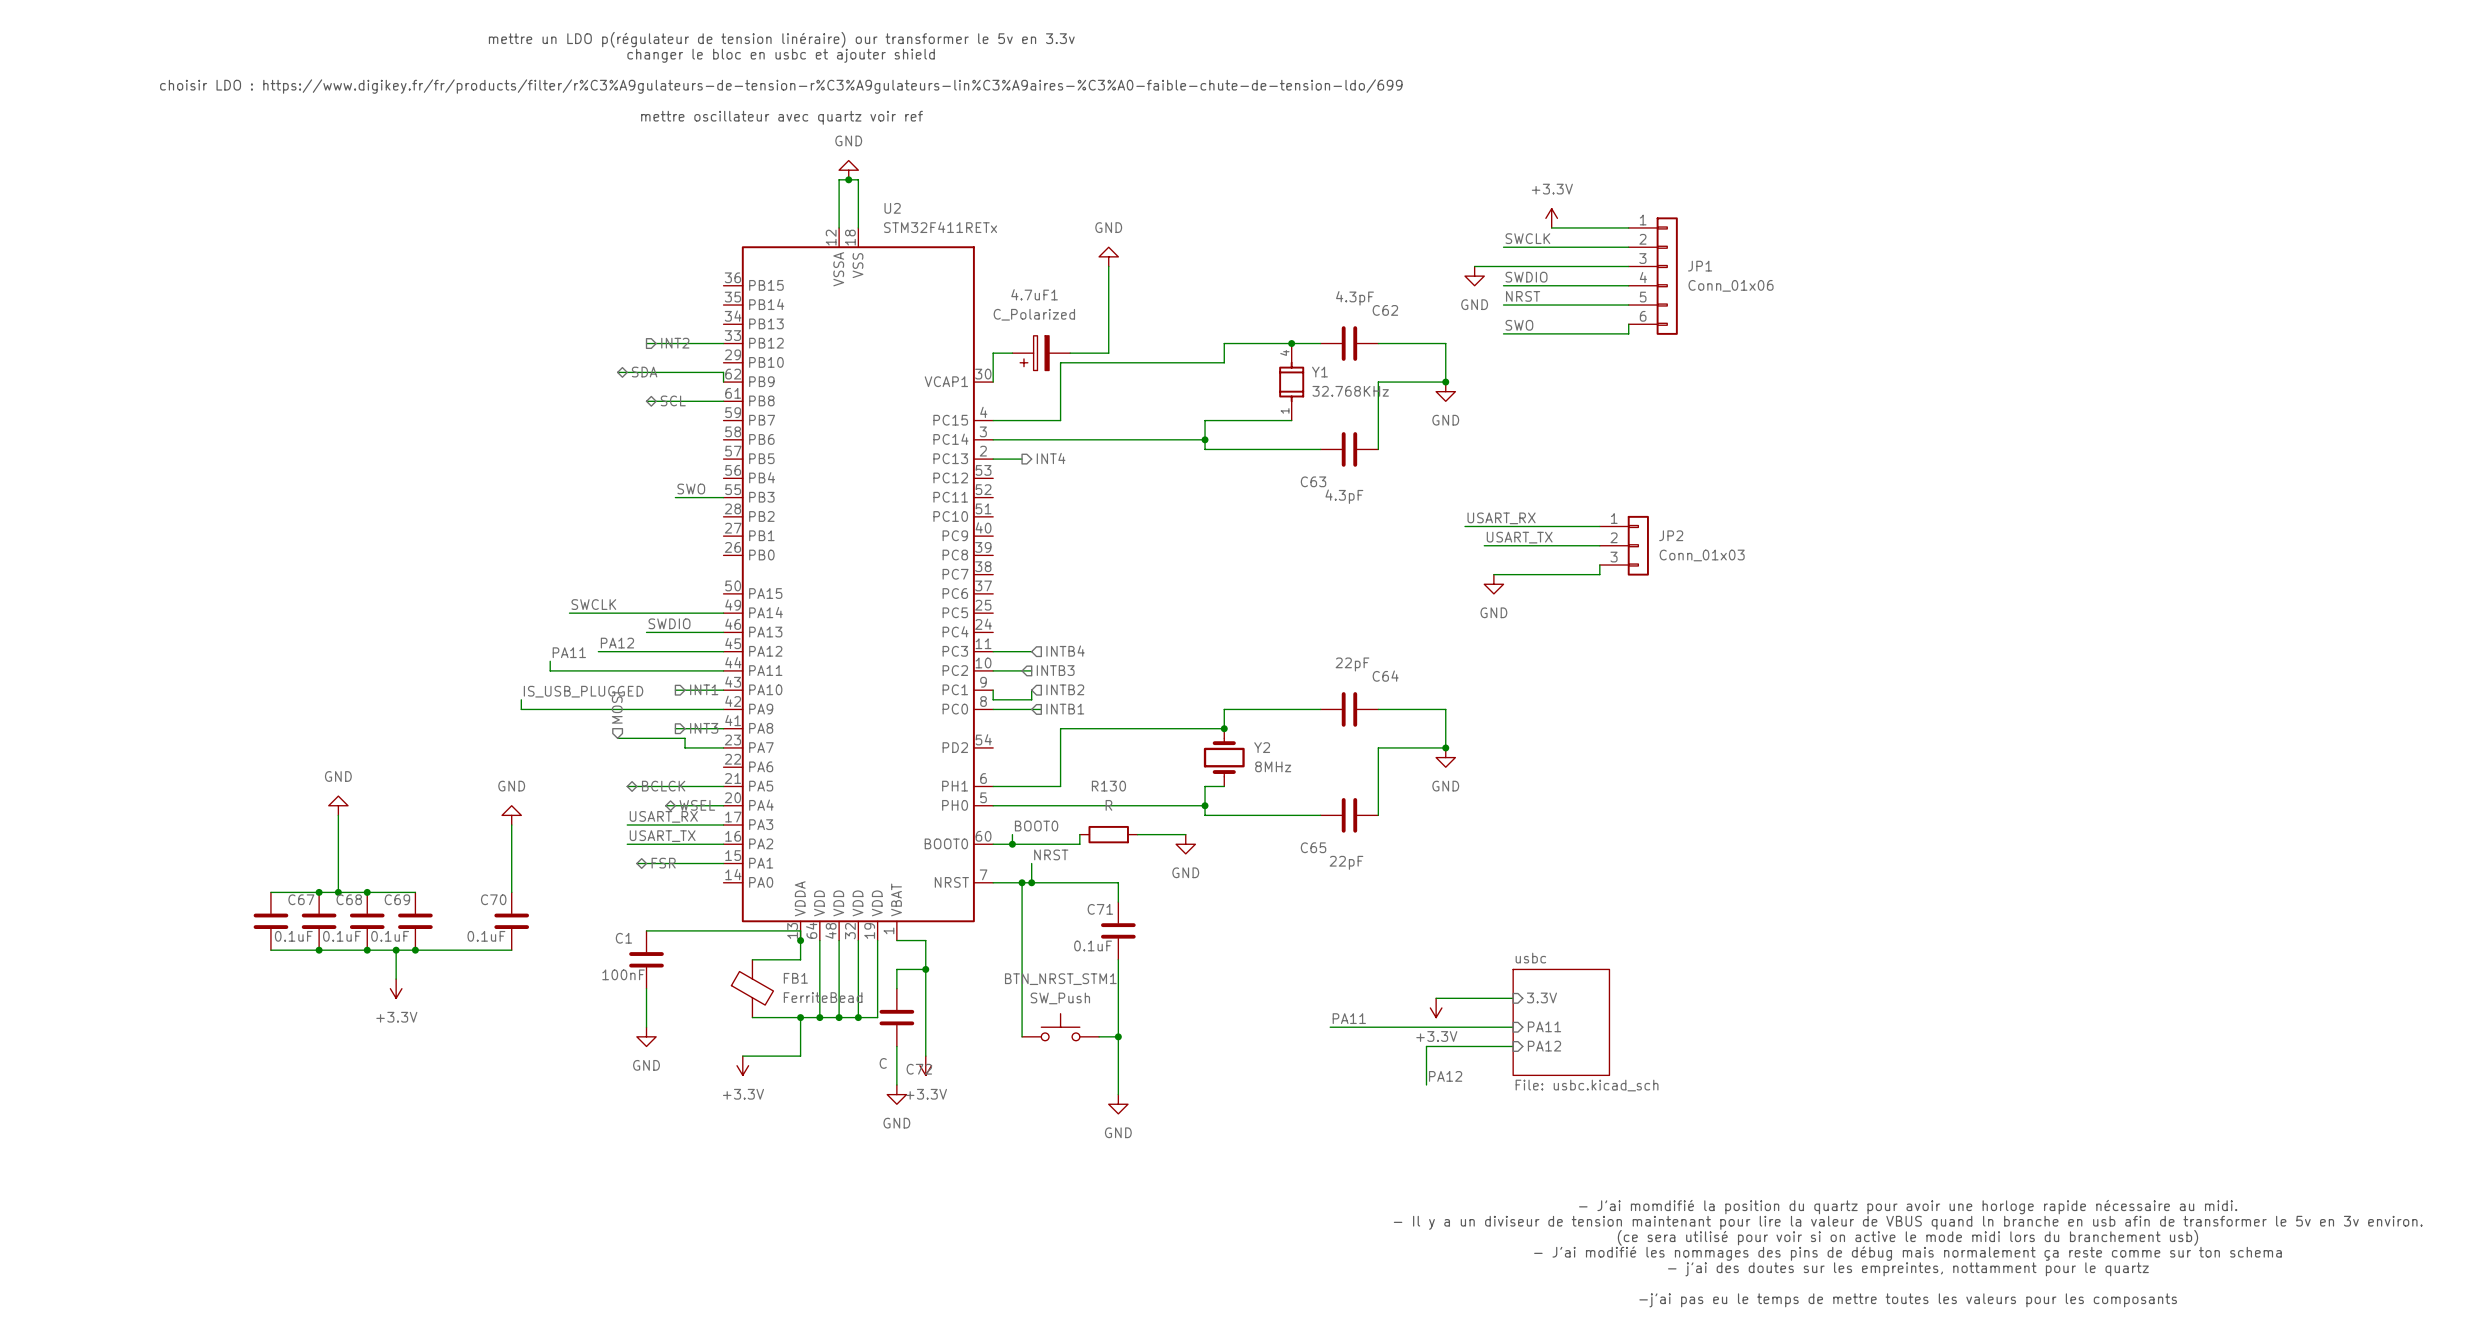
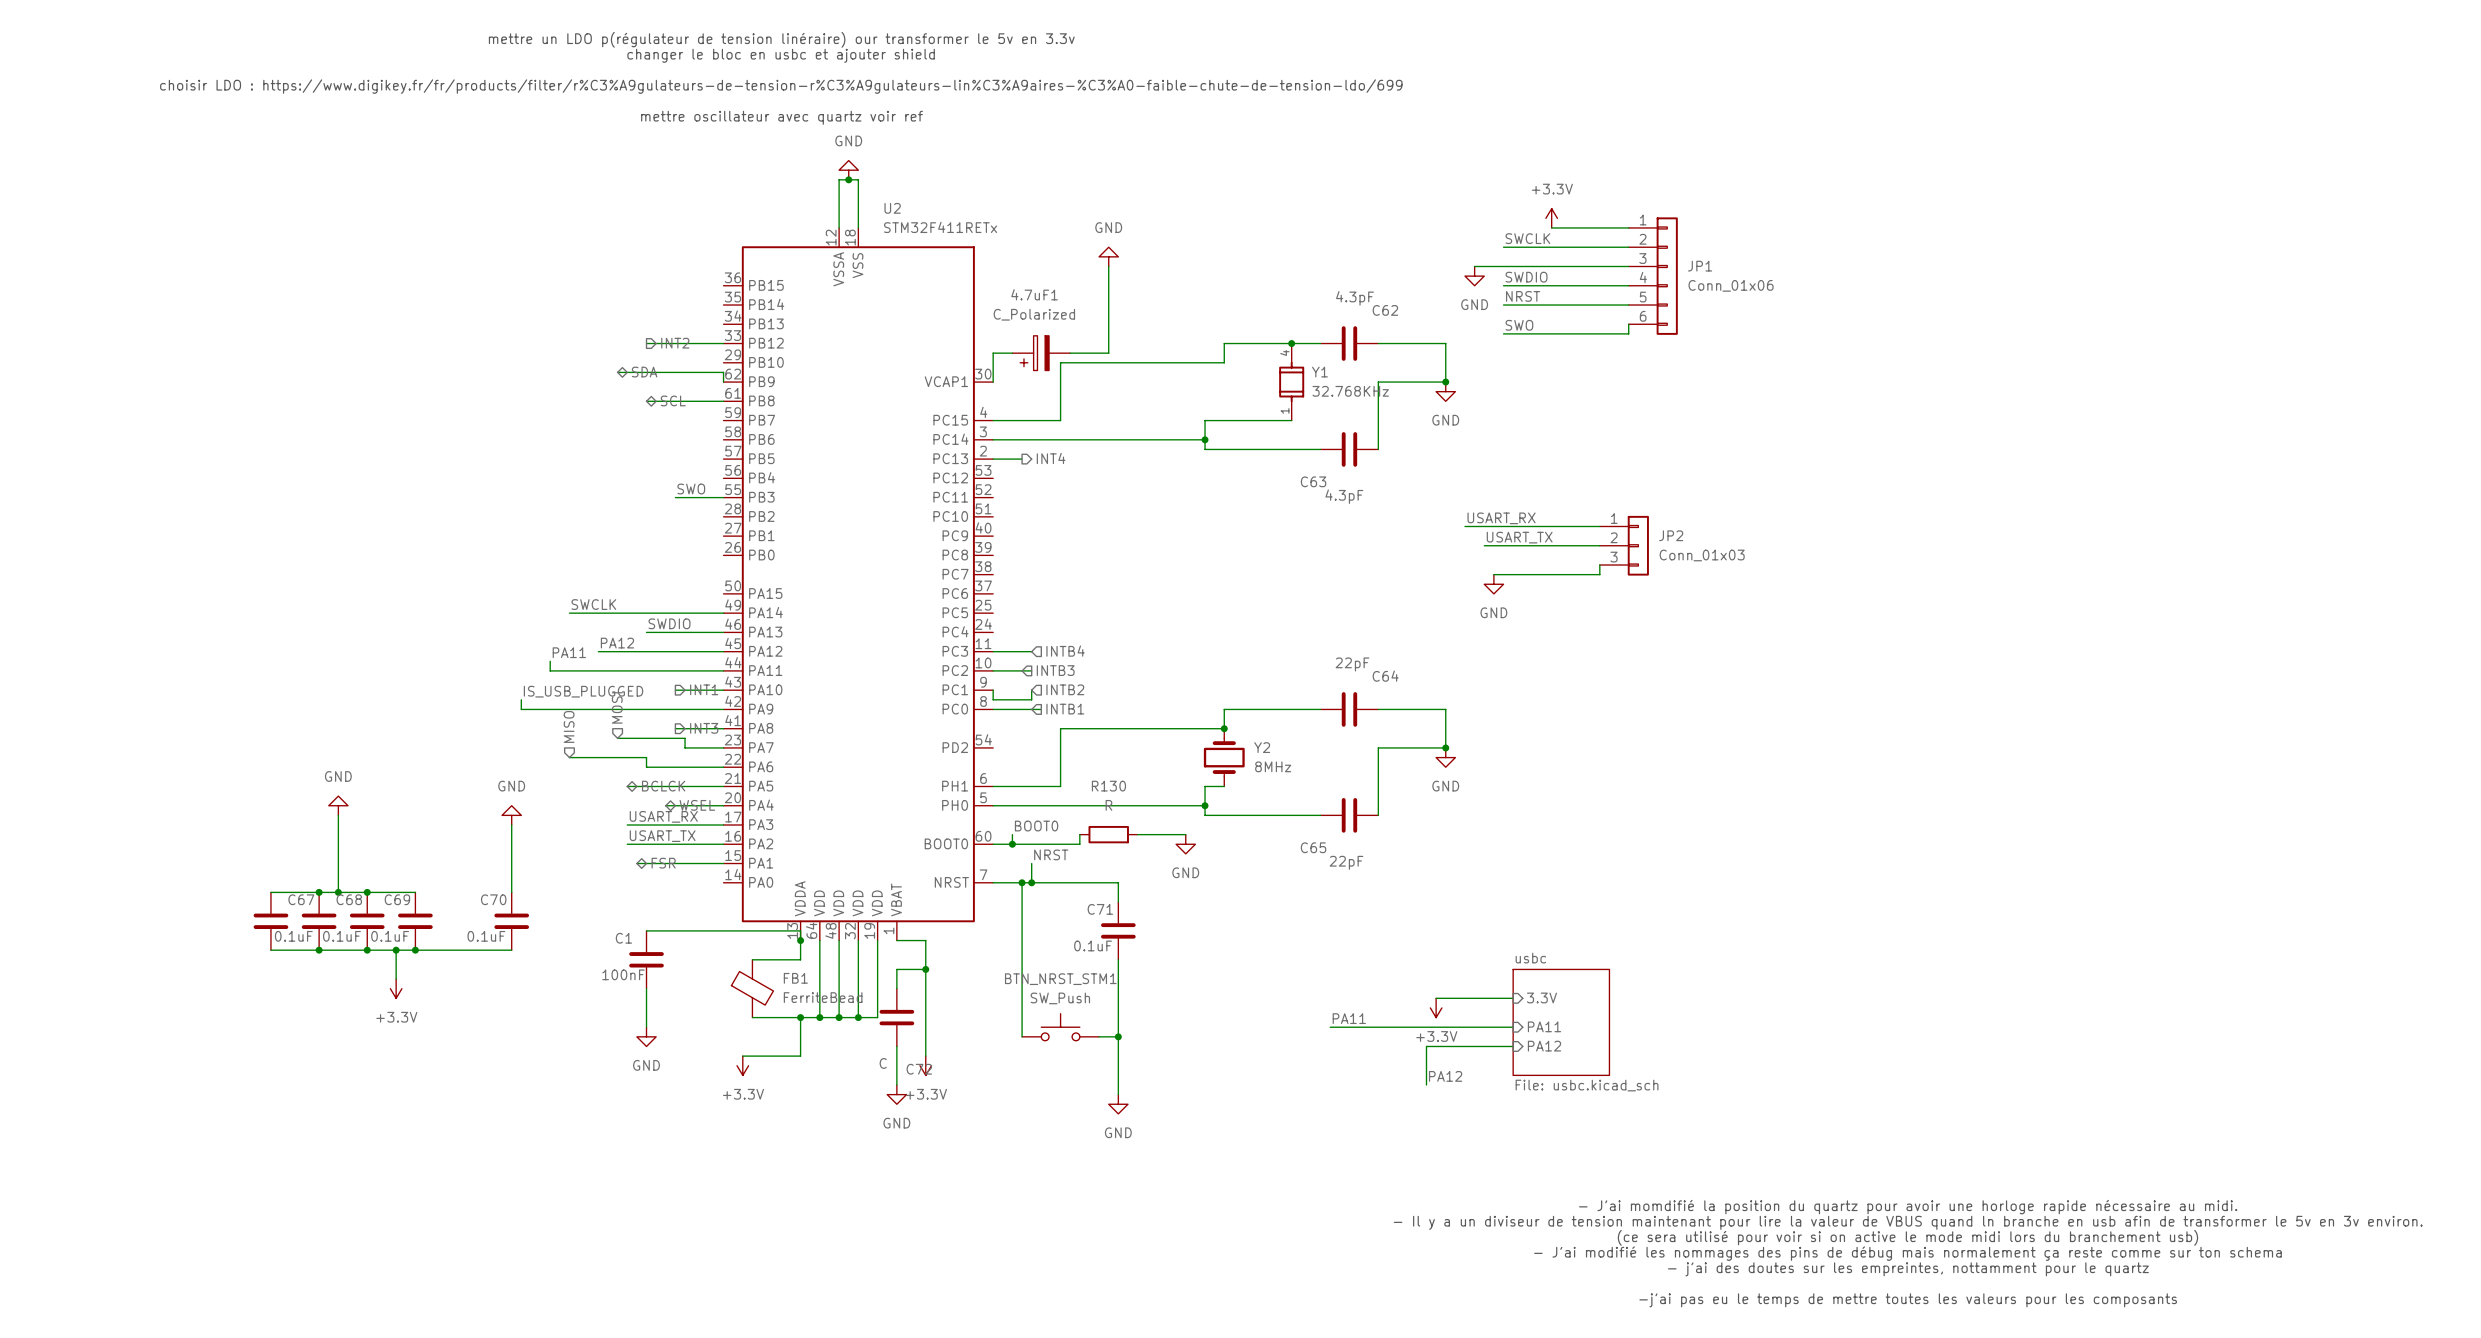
hierarchical label: none -> MISO (569, 726)
wire: none -> (569, 757) (646, 757) (646, 767) (723, 767)

